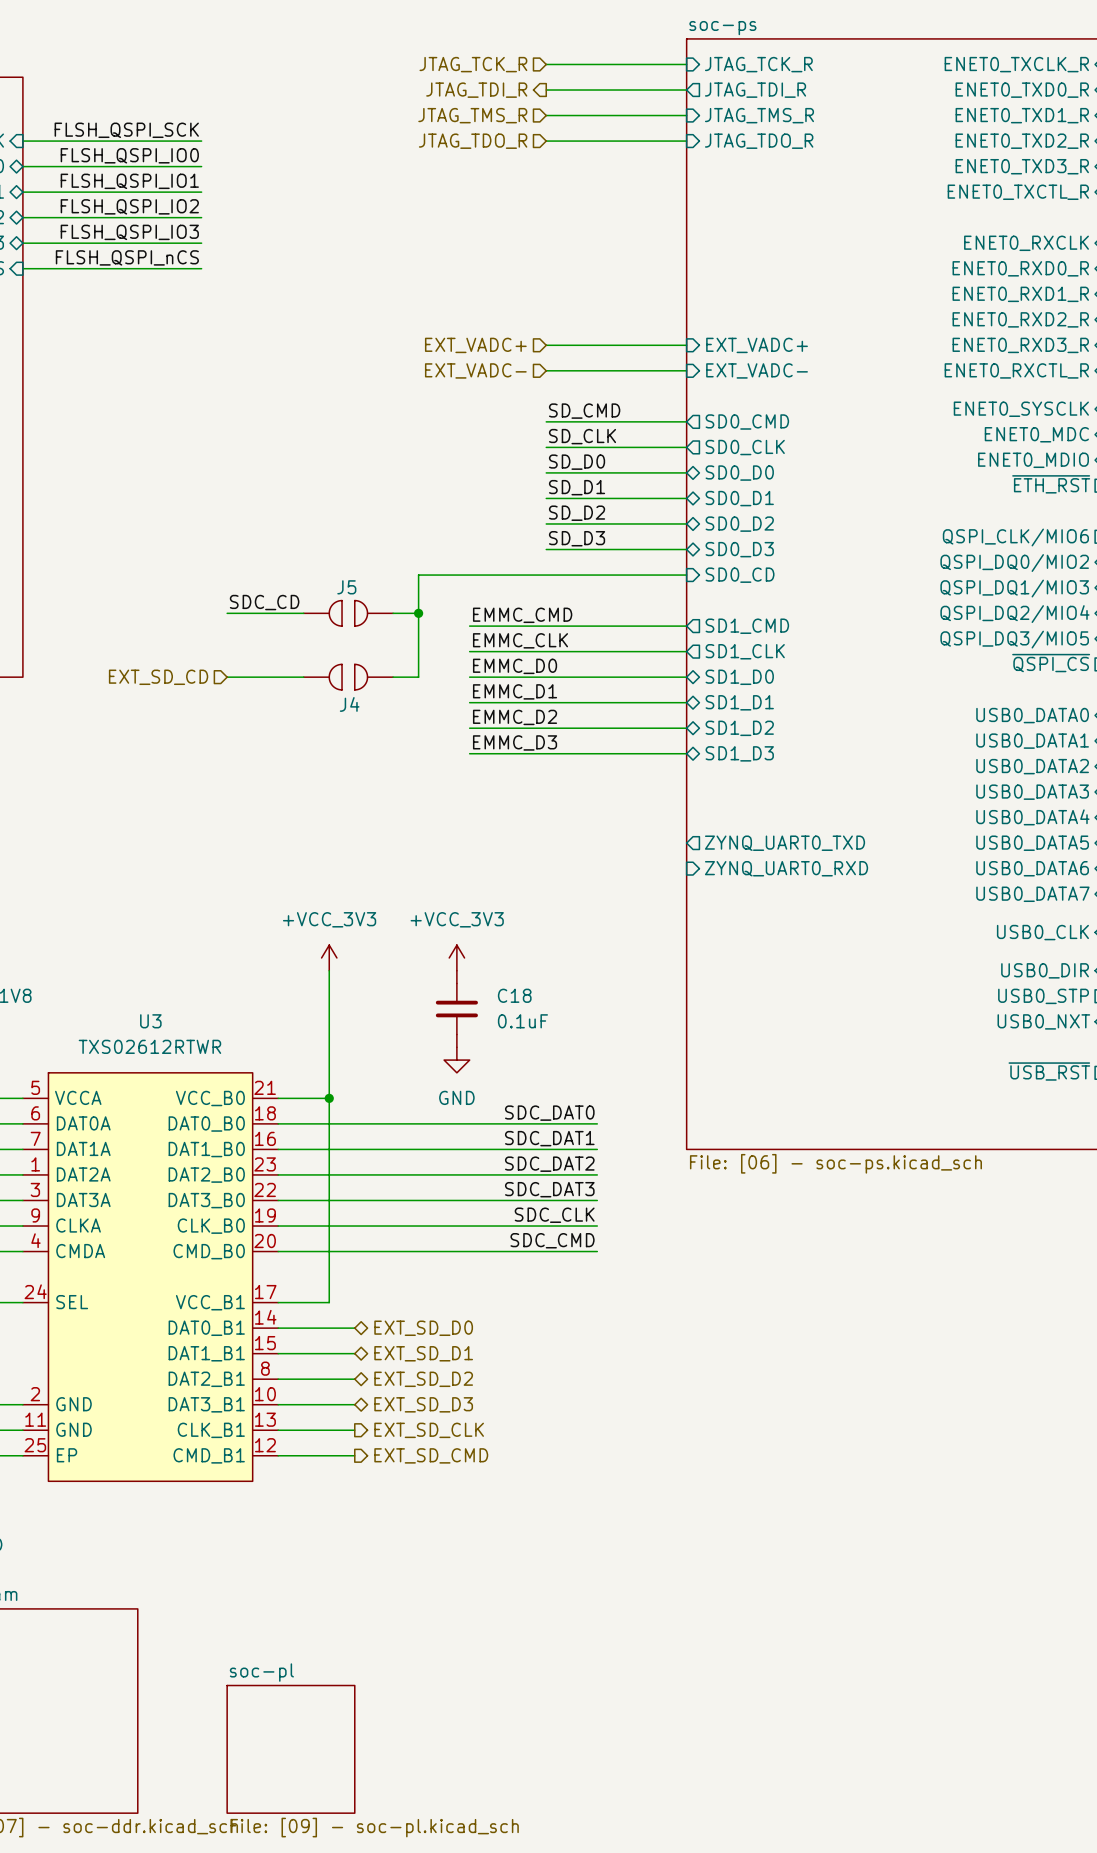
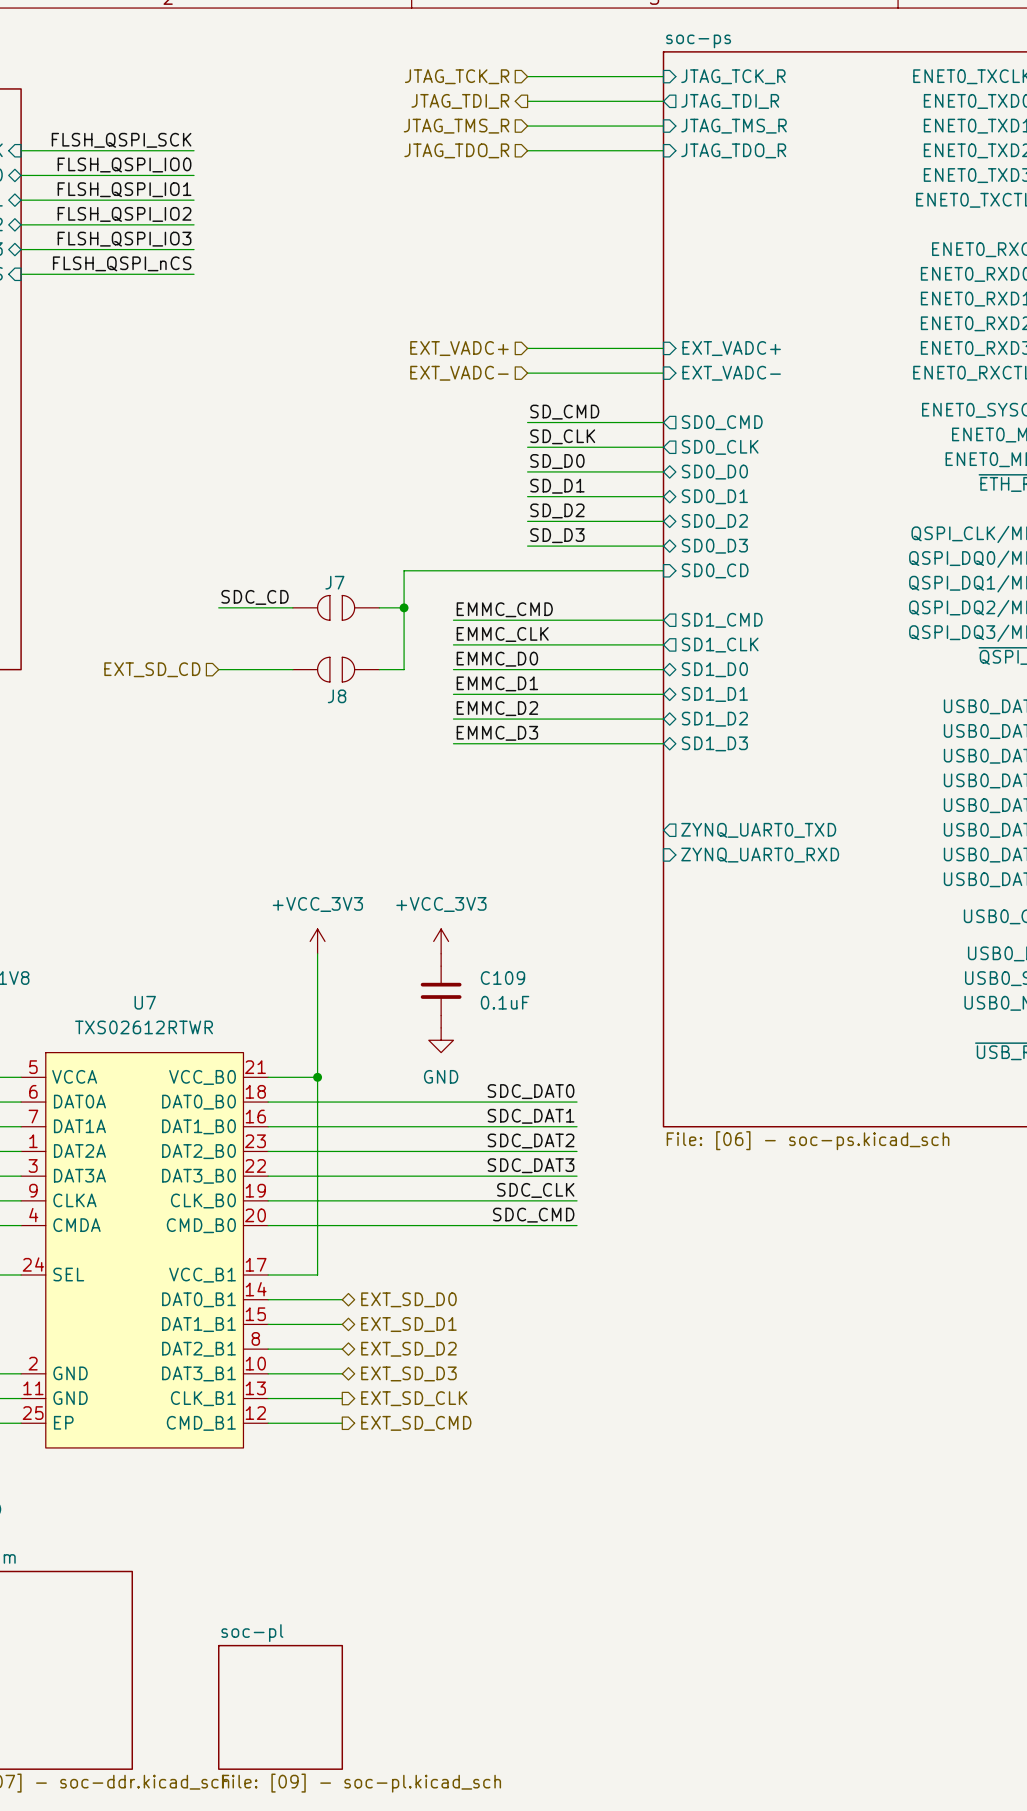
J5 name: J5 (346, 587) -> J7 (334, 582)
J4 name: J4 (349, 704) -> J8 (337, 696)
C18 name: C18 (514, 995) -> C109 (502, 978)
U3 name: U3 (150, 1021) -> U7 (145, 1002)

